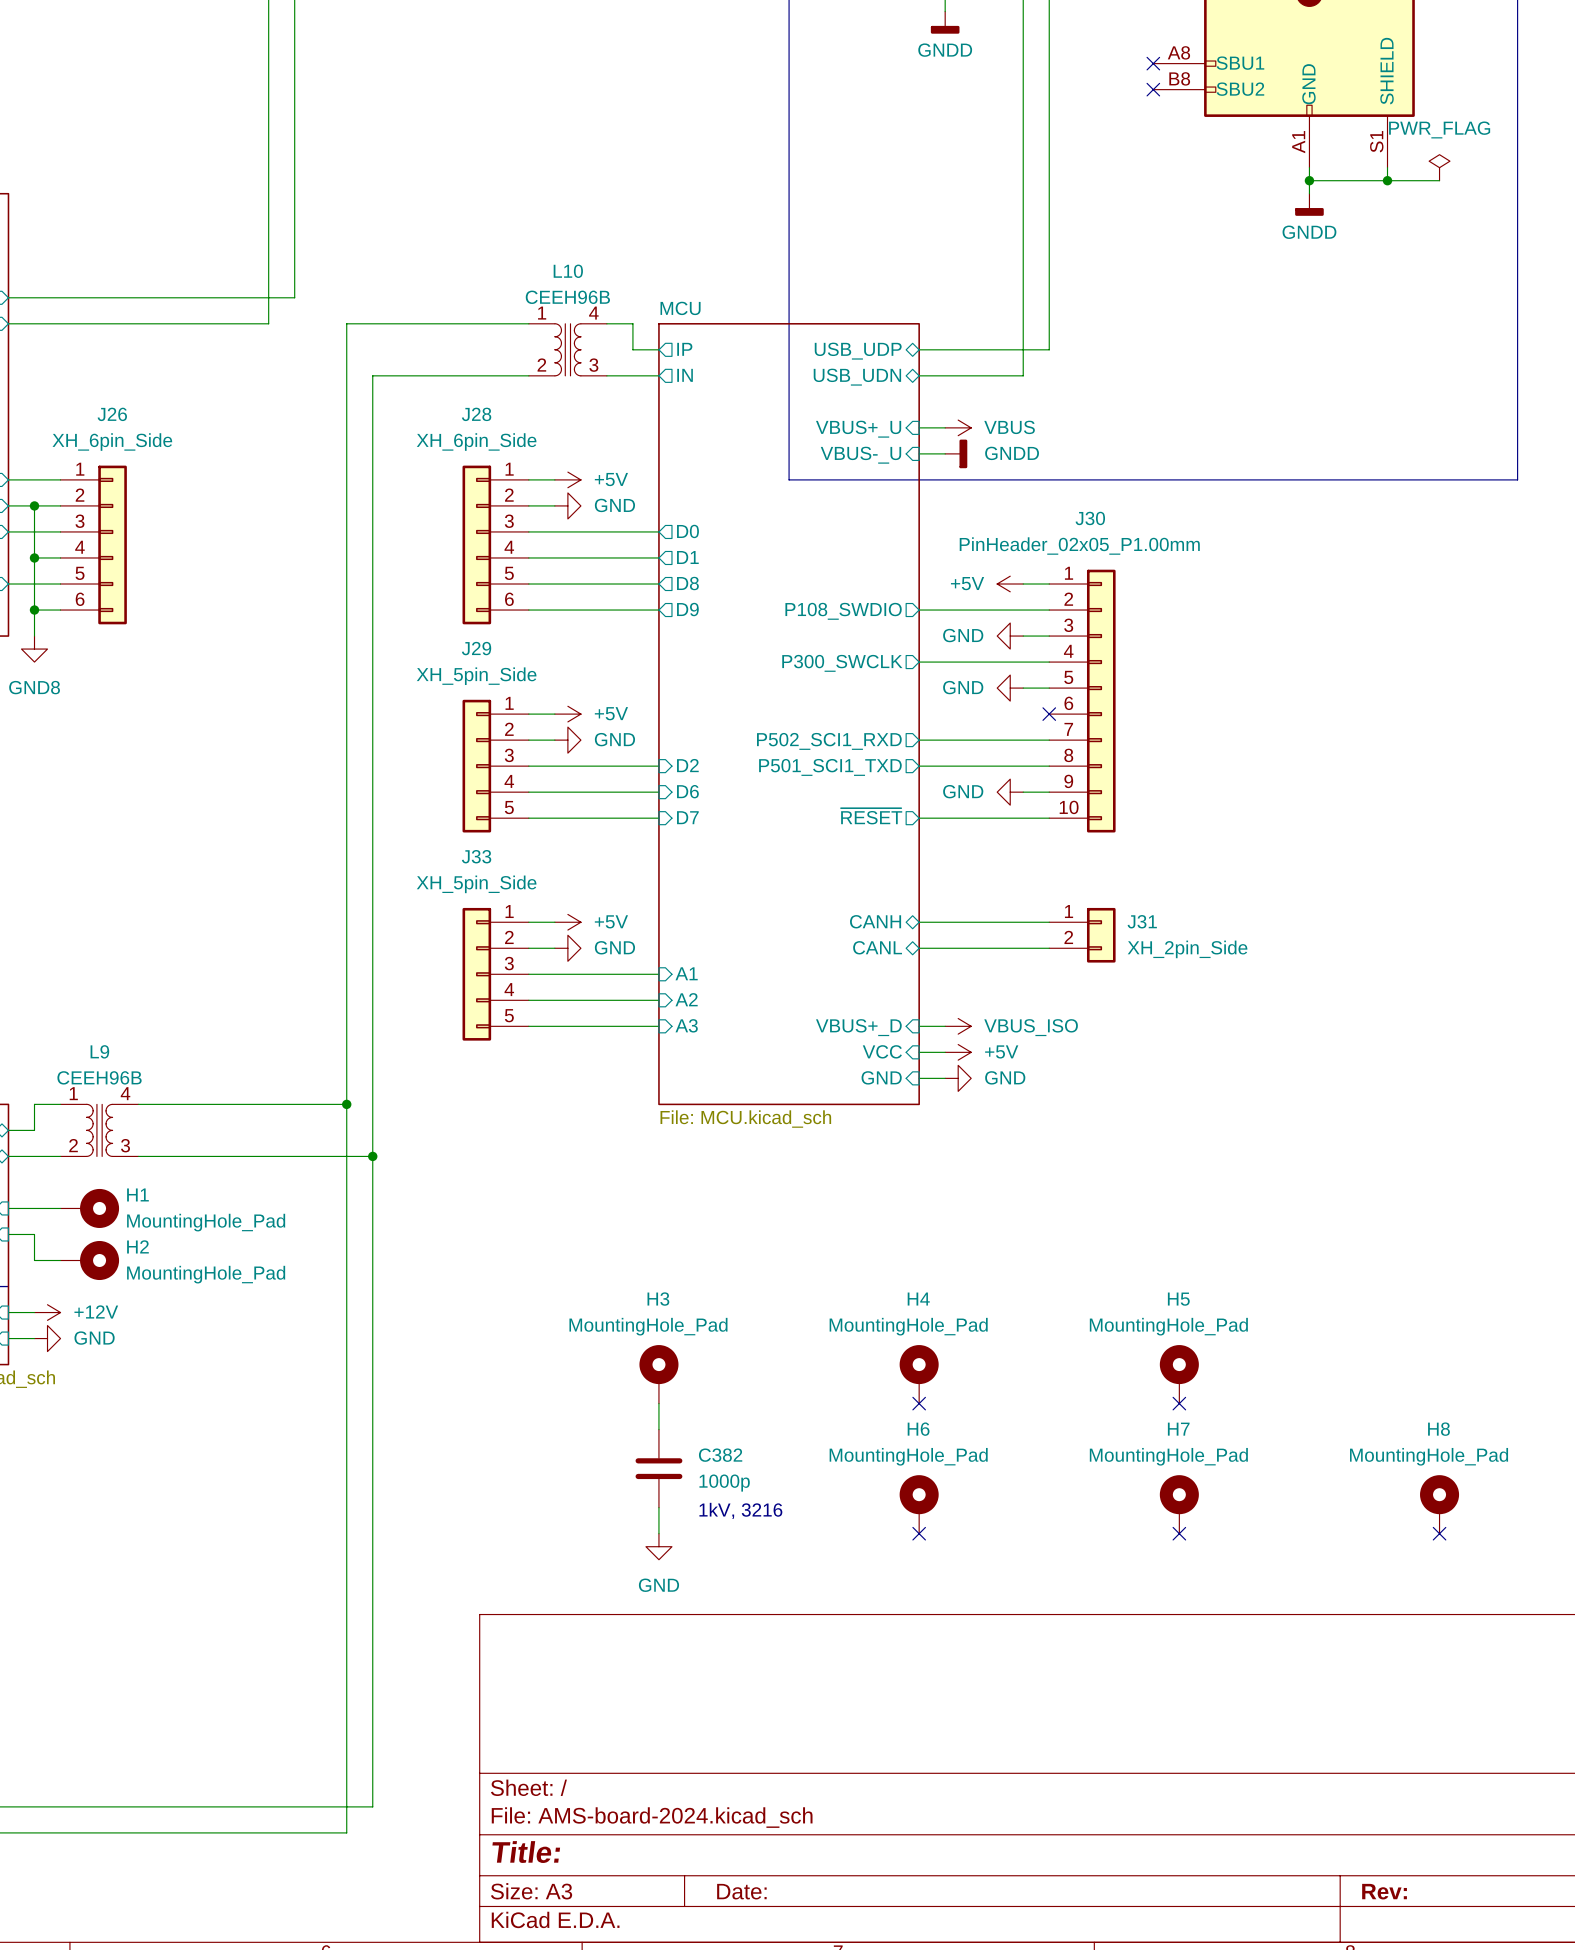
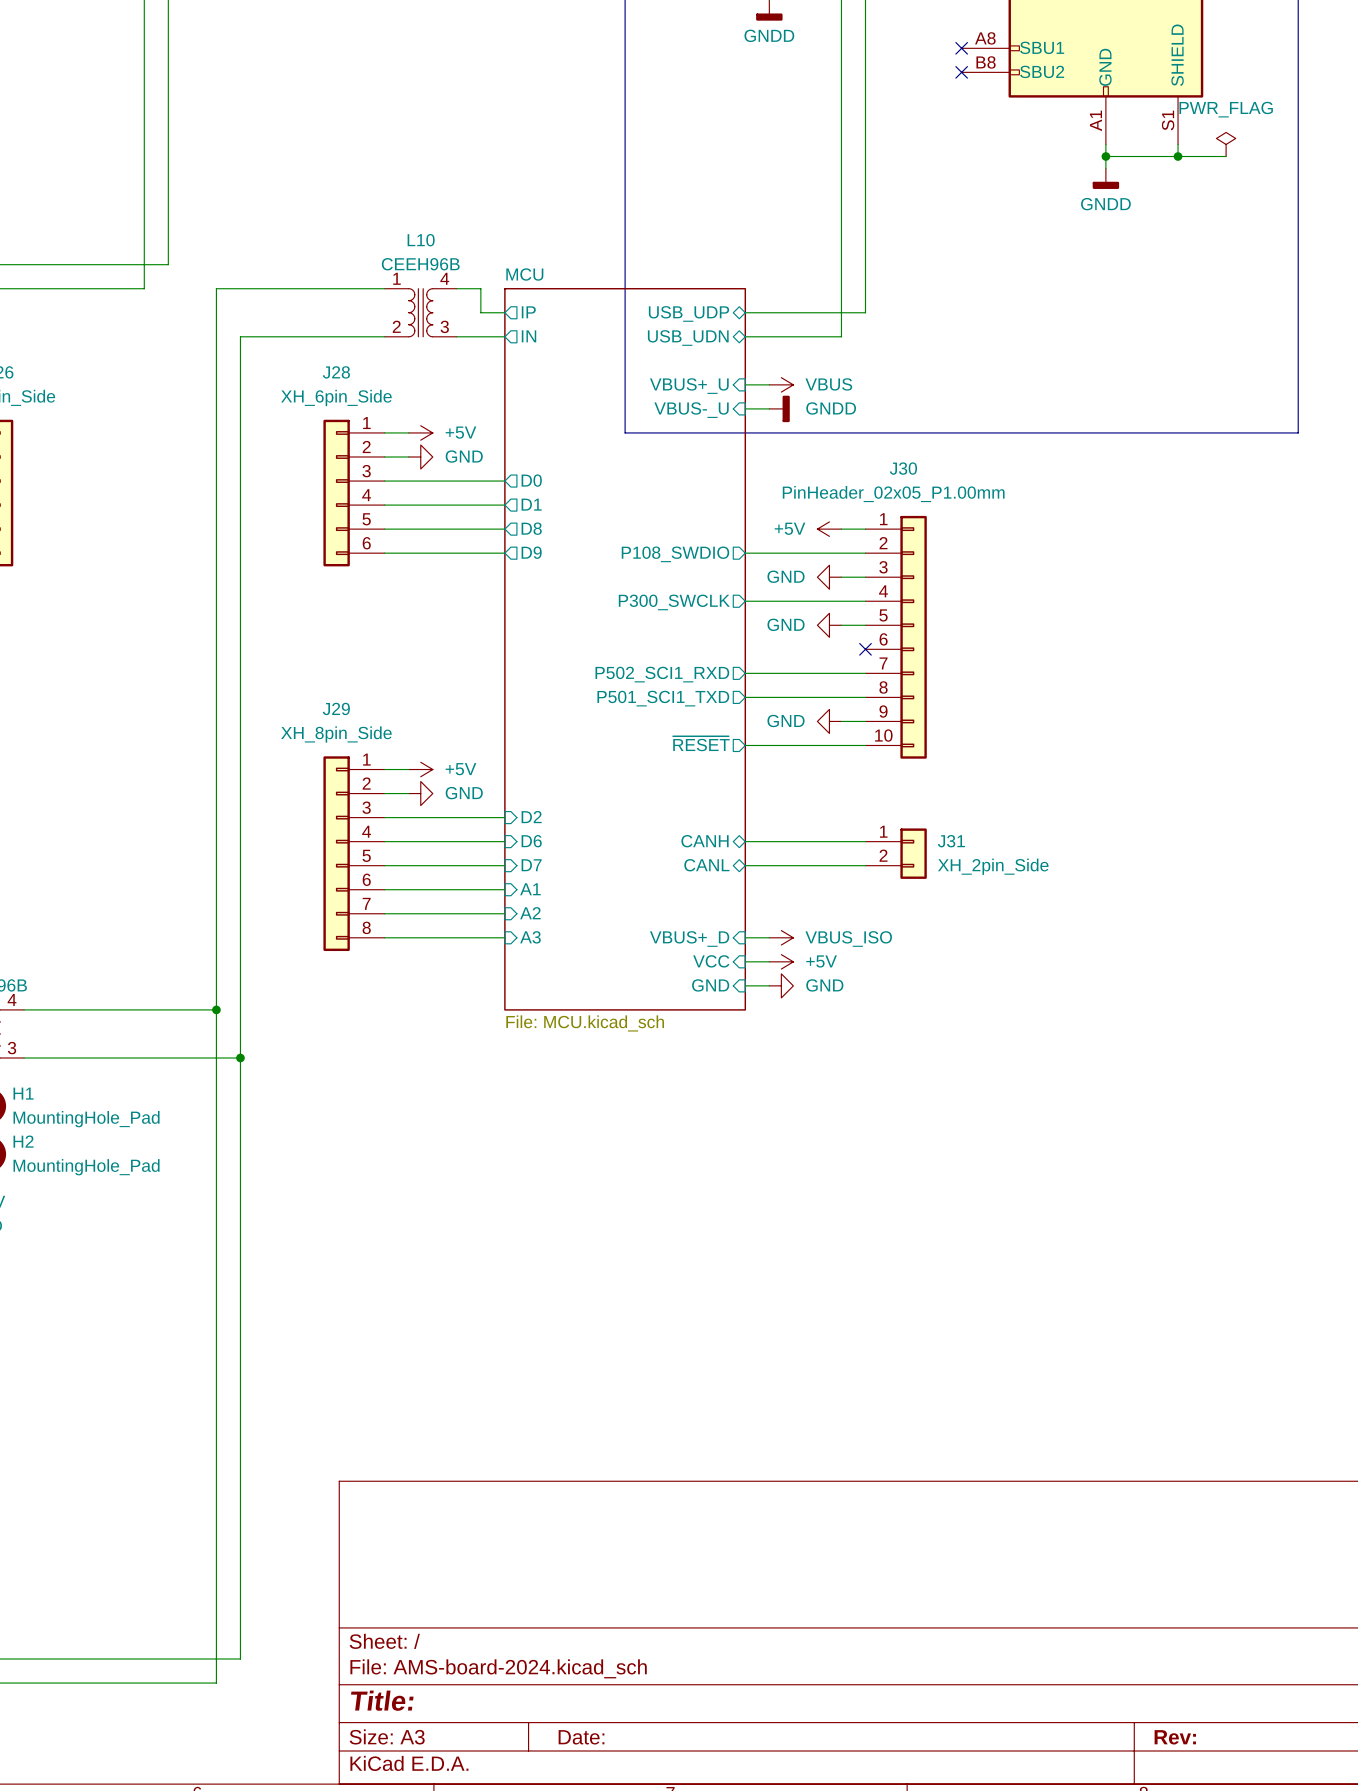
J29 name position: J29 (476, 648) -> J29 (336, 708)
J29 value: XH_5pin_Side (476, 676) -> XH_8pin_Side (336, 734)
J29 symbol: [462, 699, 529, 833] -> [323, 756, 385, 952]
wire: (528, 714) (554, 714) -> (384, 769) (408, 769)
power symbol: +5V (567, 714) -> none
wire: (528, 740) (554, 740) -> (384, 793) (408, 793)
power symbol: GND (567, 740) -> none
sheet pin position: D2 (687, 765) -> D2 (531, 817)
wire: (528, 766) (658, 766) -> (384, 817) (504, 817)
sheet pin position: D6 (687, 791) -> D6 (531, 841)
wire: (528, 792) (658, 792) -> none
sheet pin position: D7 (687, 817) -> D7 (531, 865)
wire: (528, 818) (658, 818) -> none
power symbol: none -> +5V (420, 769)
power symbol: none -> GND (420, 793)
wire: none -> (408, 841) (504, 841)
power symbol: +5V (567, 922) -> none
wire: none -> (408, 865) (504, 865)
power symbol: GND (567, 948) -> none
J33: XH_5pin_Side (495, 974) -> none
H3: MountingHole_Pad (658, 1374) -> none
H4: MountingHole_Pad (919, 1374) -> none
H5: MountingHole_Pad (1179, 1374) -> none
wire: (658, 1403) (658, 1429) -> none
no-connect mark: (919, 1403) -> none
no-connect mark: (1179, 1403) -> none
C382: 1000p (658, 1468) -> none
H6: MountingHole_Pad (919, 1504) -> none
H7: MountingHole_Pad (1179, 1504) -> none
H8: MountingHole_Pad (1439, 1504) -> none
wire: (658, 1507) (658, 1533) -> none
text: 1kV, 3216 (740, 1510) -> none
no-connect mark: (919, 1533) -> none
no-connect mark: (1179, 1533) -> none
no-connect mark: (1439, 1533) -> none
power symbol: GND (658, 1546) -> none

